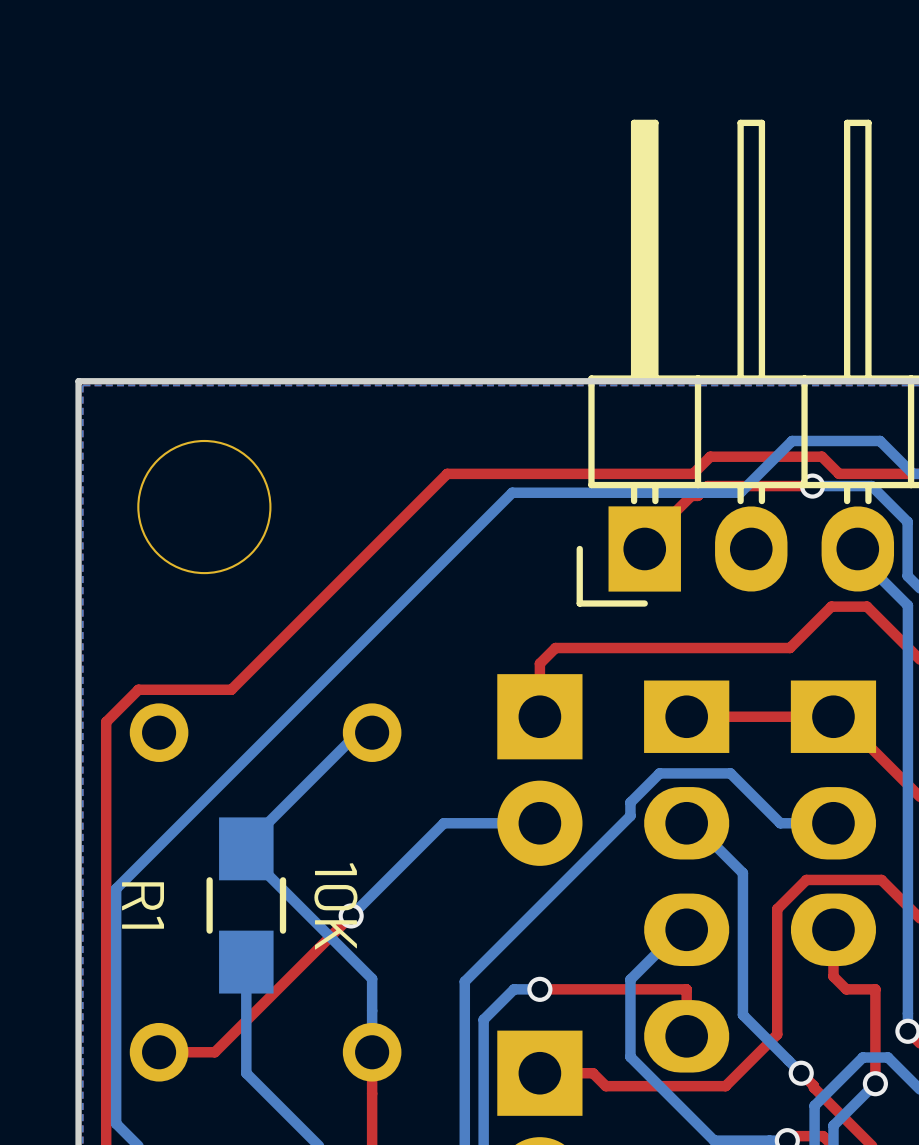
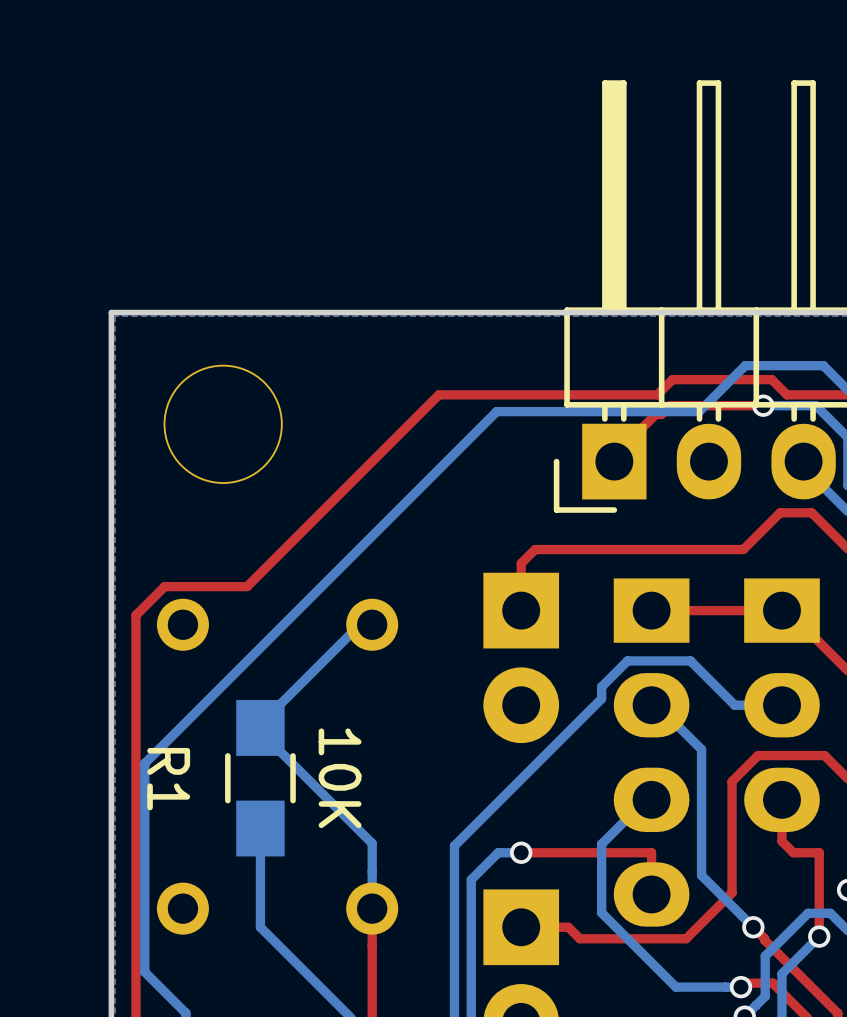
bottom track: (539, 823) (443, 823) (351, 915) -> none
top track: (351, 915) (214, 1052) (159, 1052) -> none
via: (351, 915) -> none

